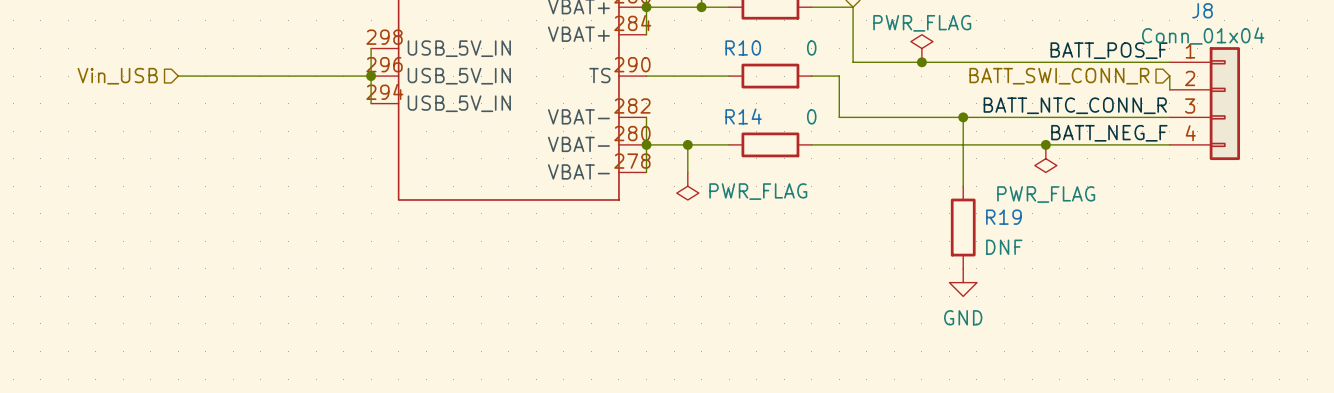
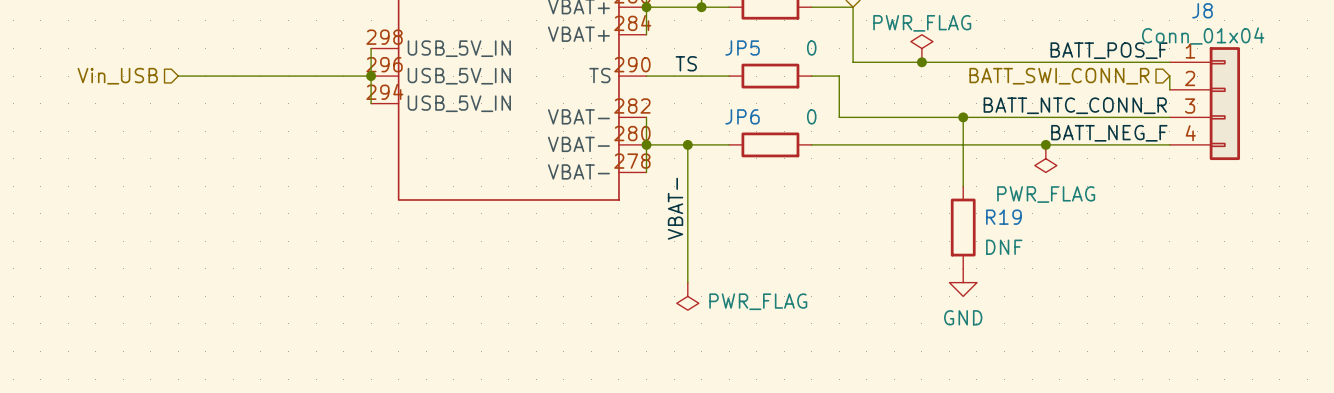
R10 name: R10 (743, 48) -> JP5 (742, 48)
label: none -> TS (686, 63)
R14 name: R14 (743, 116) -> JP6 (742, 116)
wire: none -> (687, 172) (687, 282)
power symbol position: PWR_FLAG (687, 186) -> PWR_FLAG (687, 296)
label: none -> VBAT- (675, 208)

